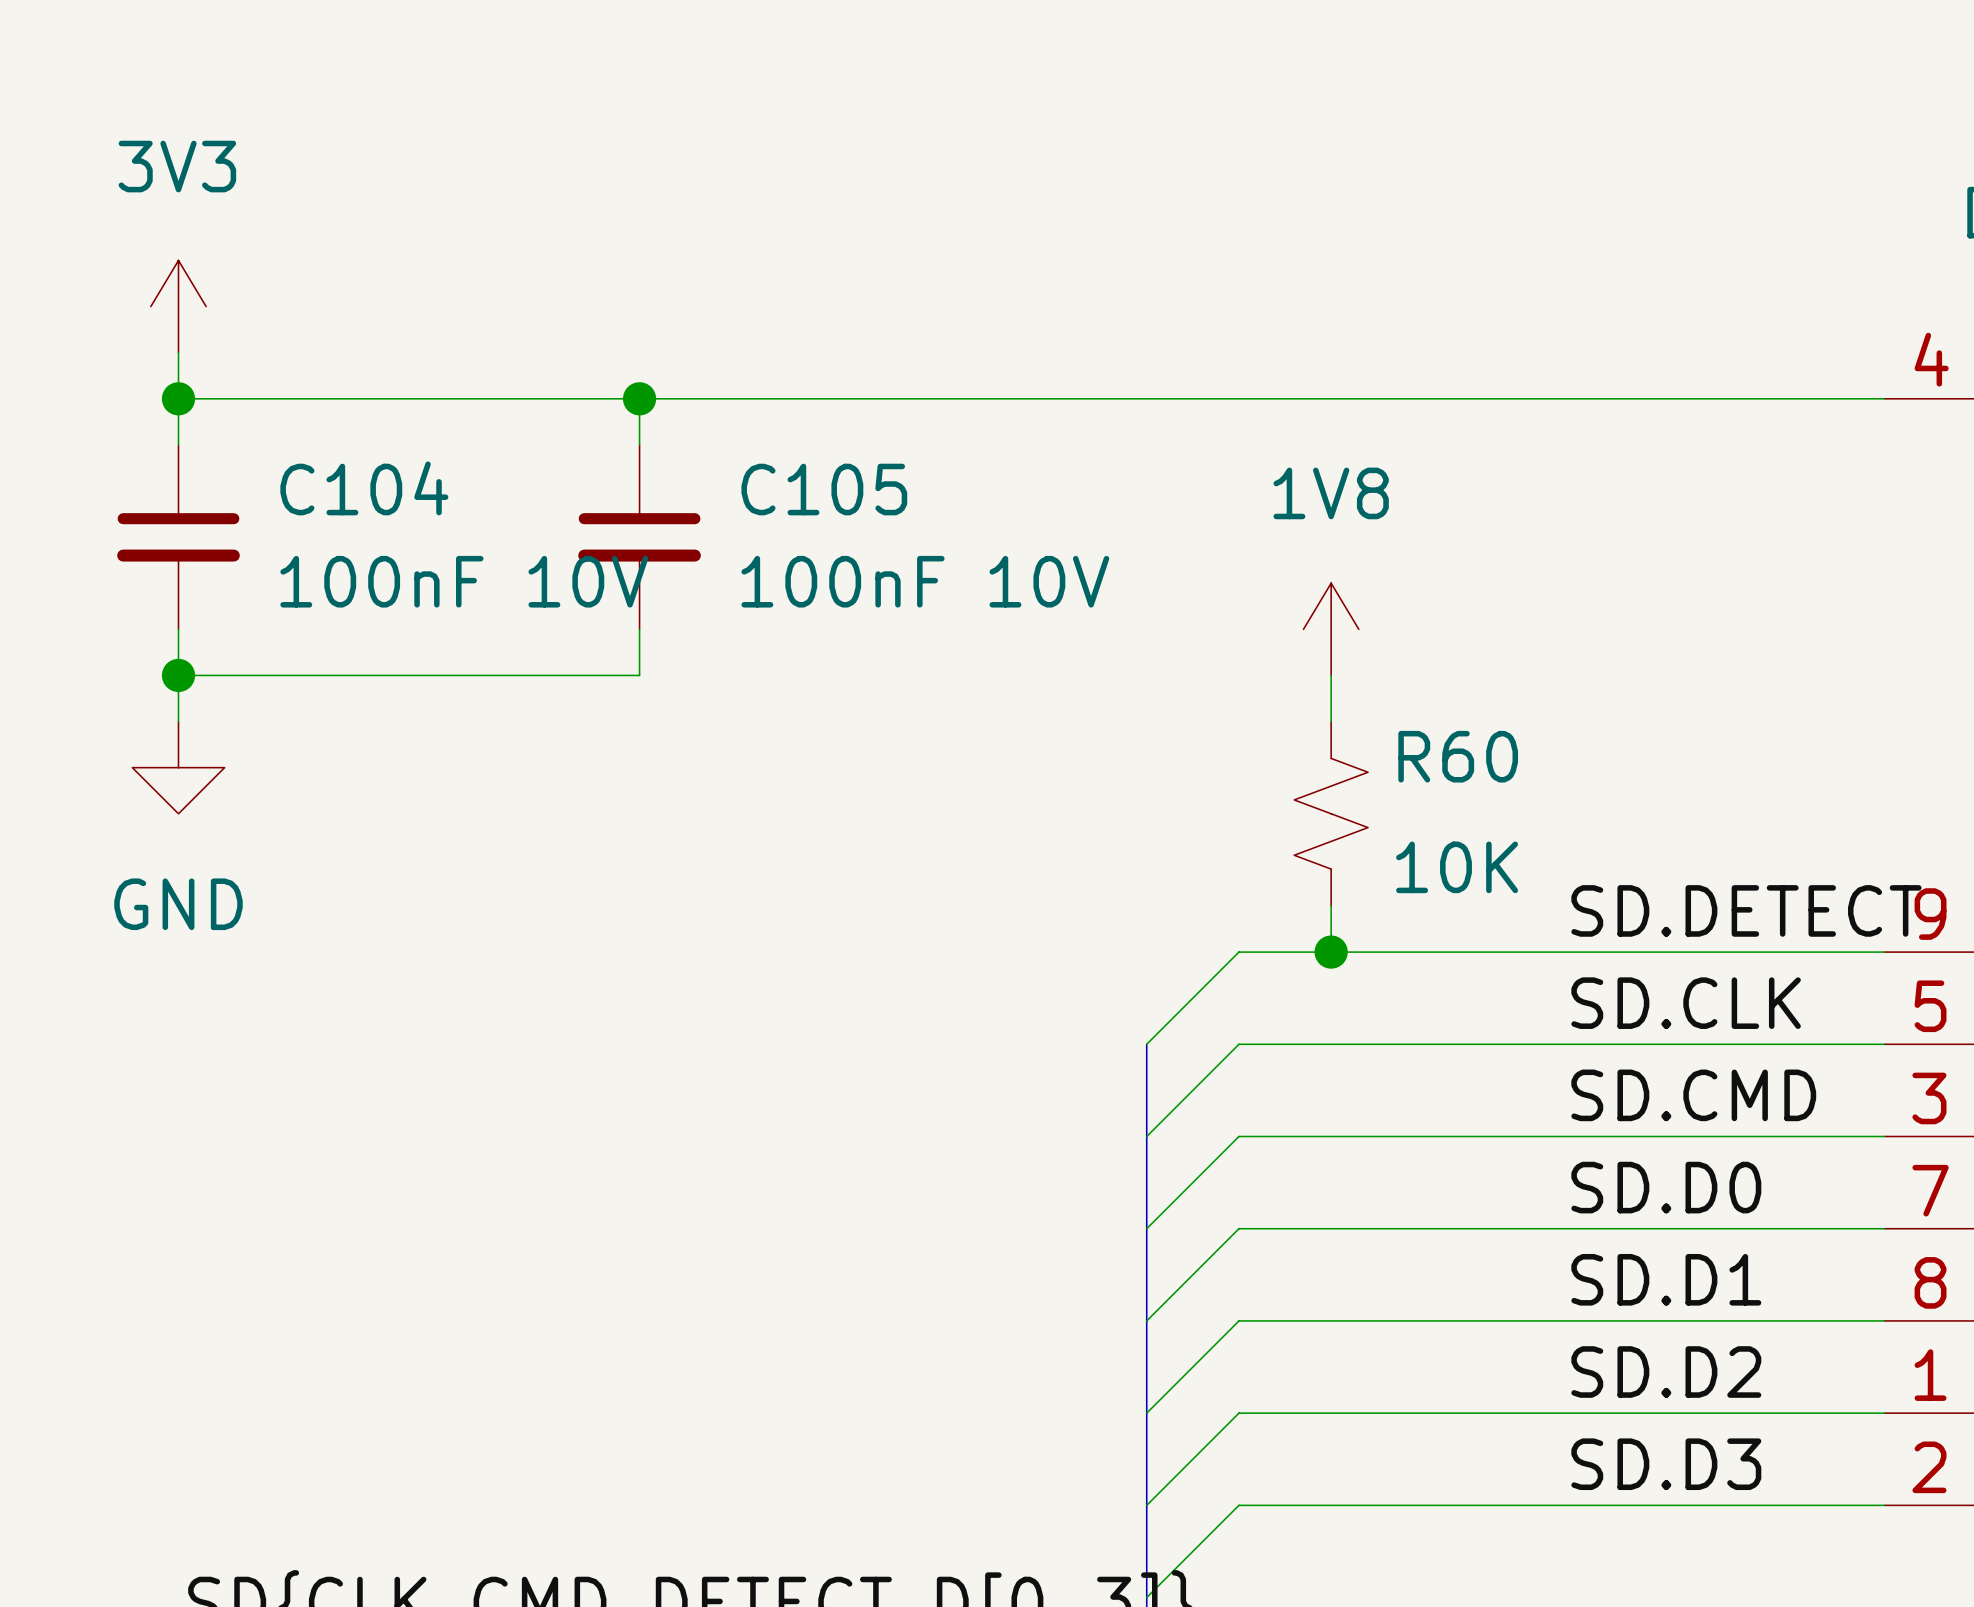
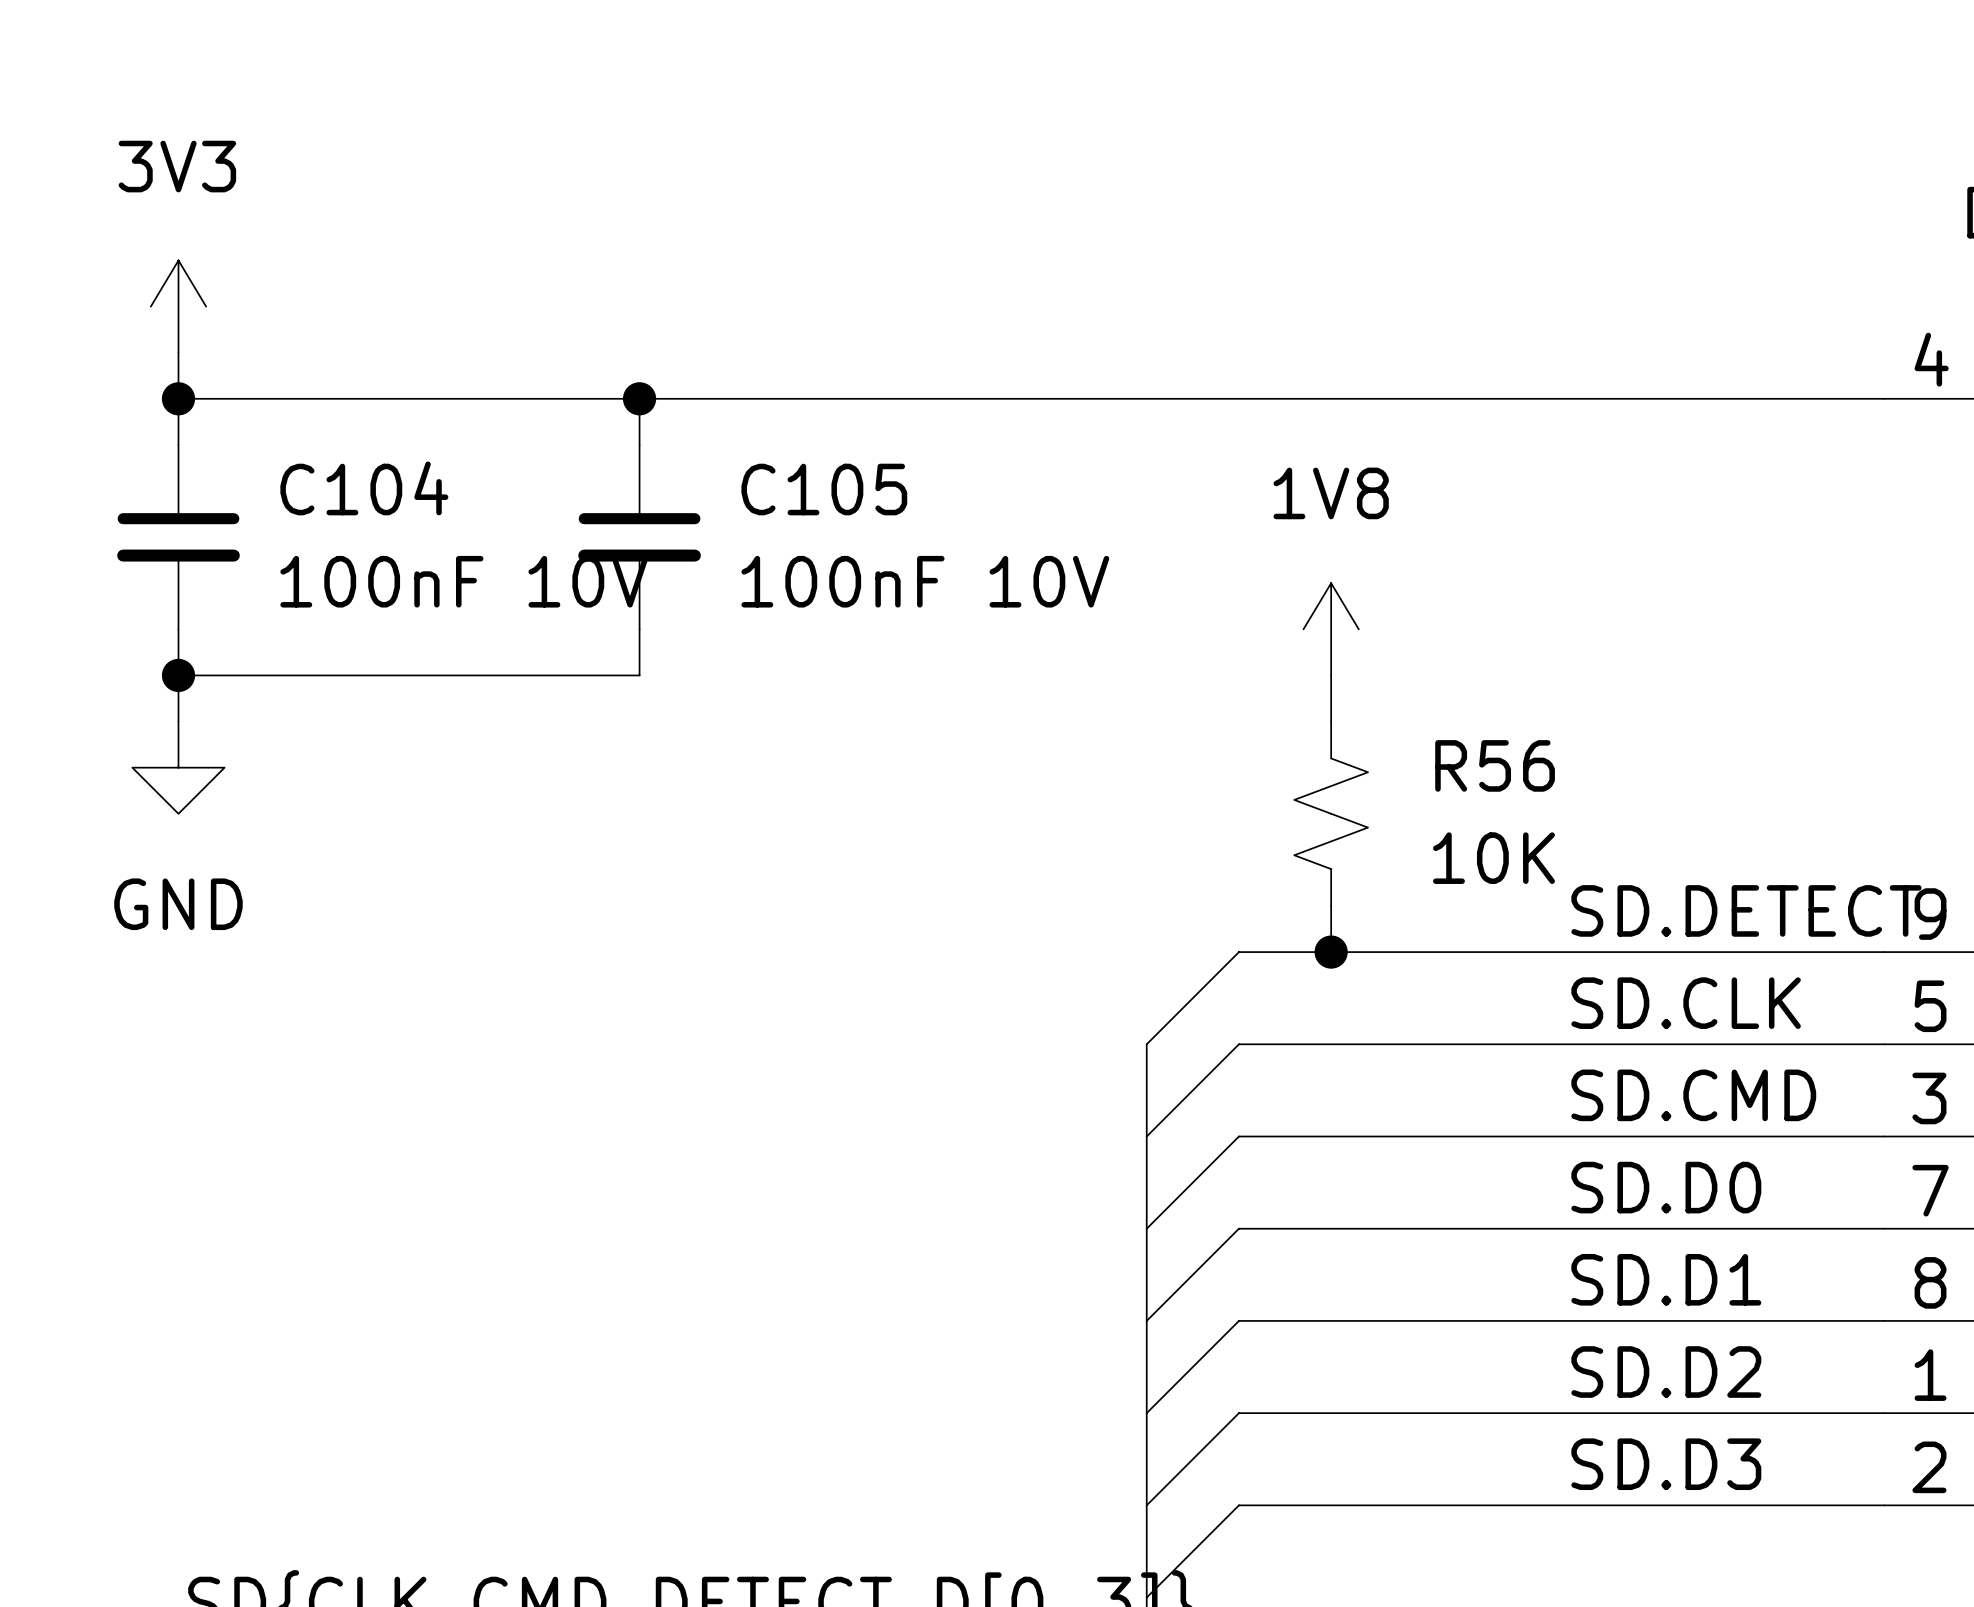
R60 name: R60 (1458, 756) -> R56 (1495, 765)
R60 value position: 10K (1457, 867) -> 10K (1493, 858)

